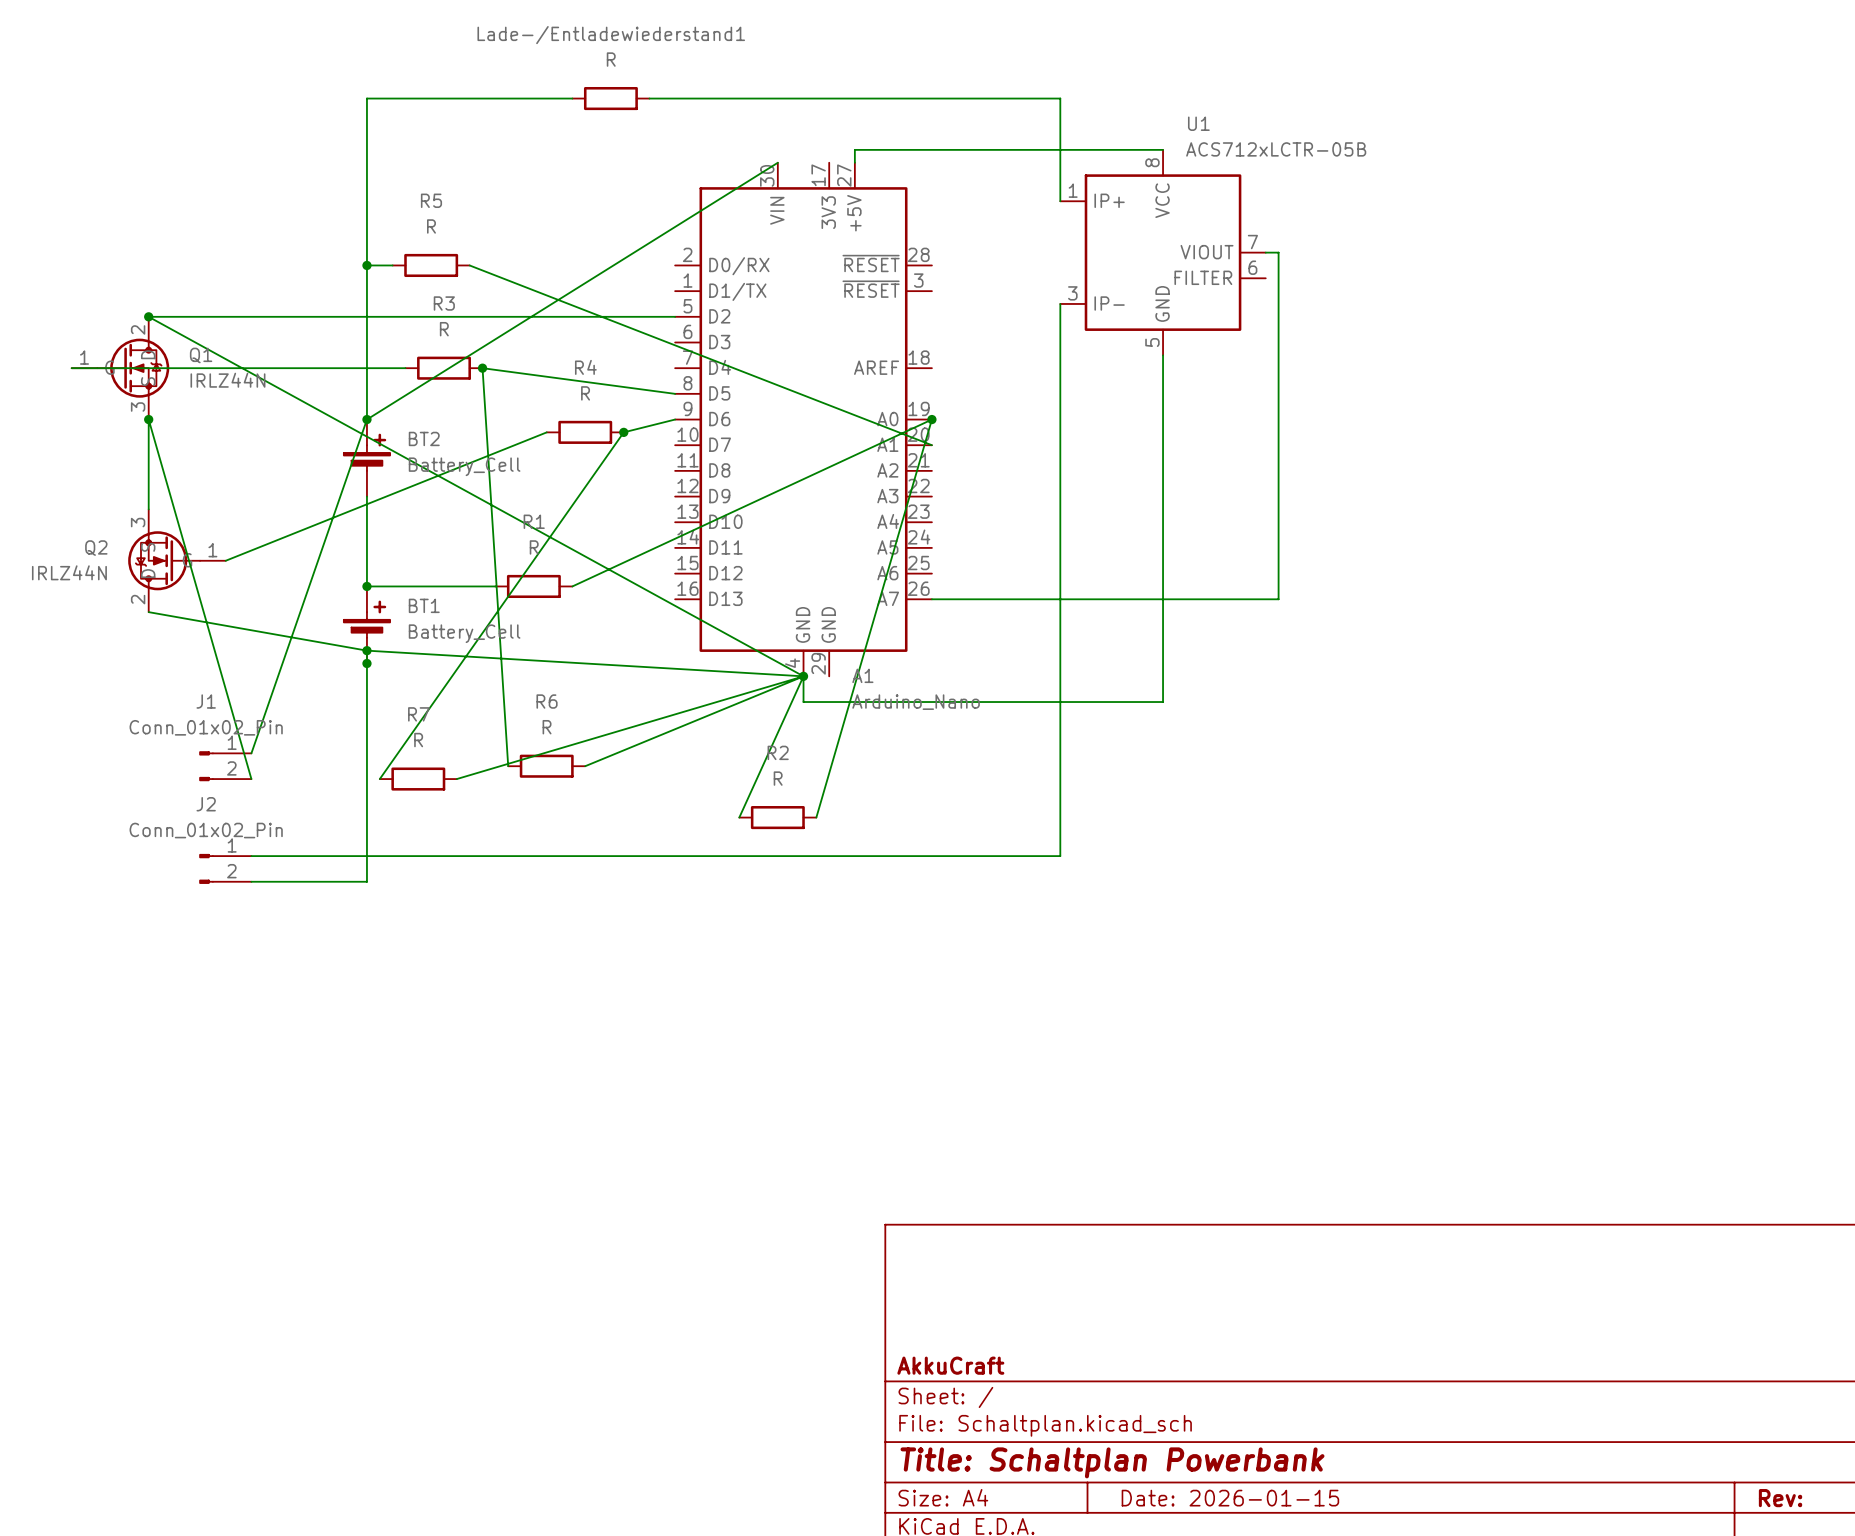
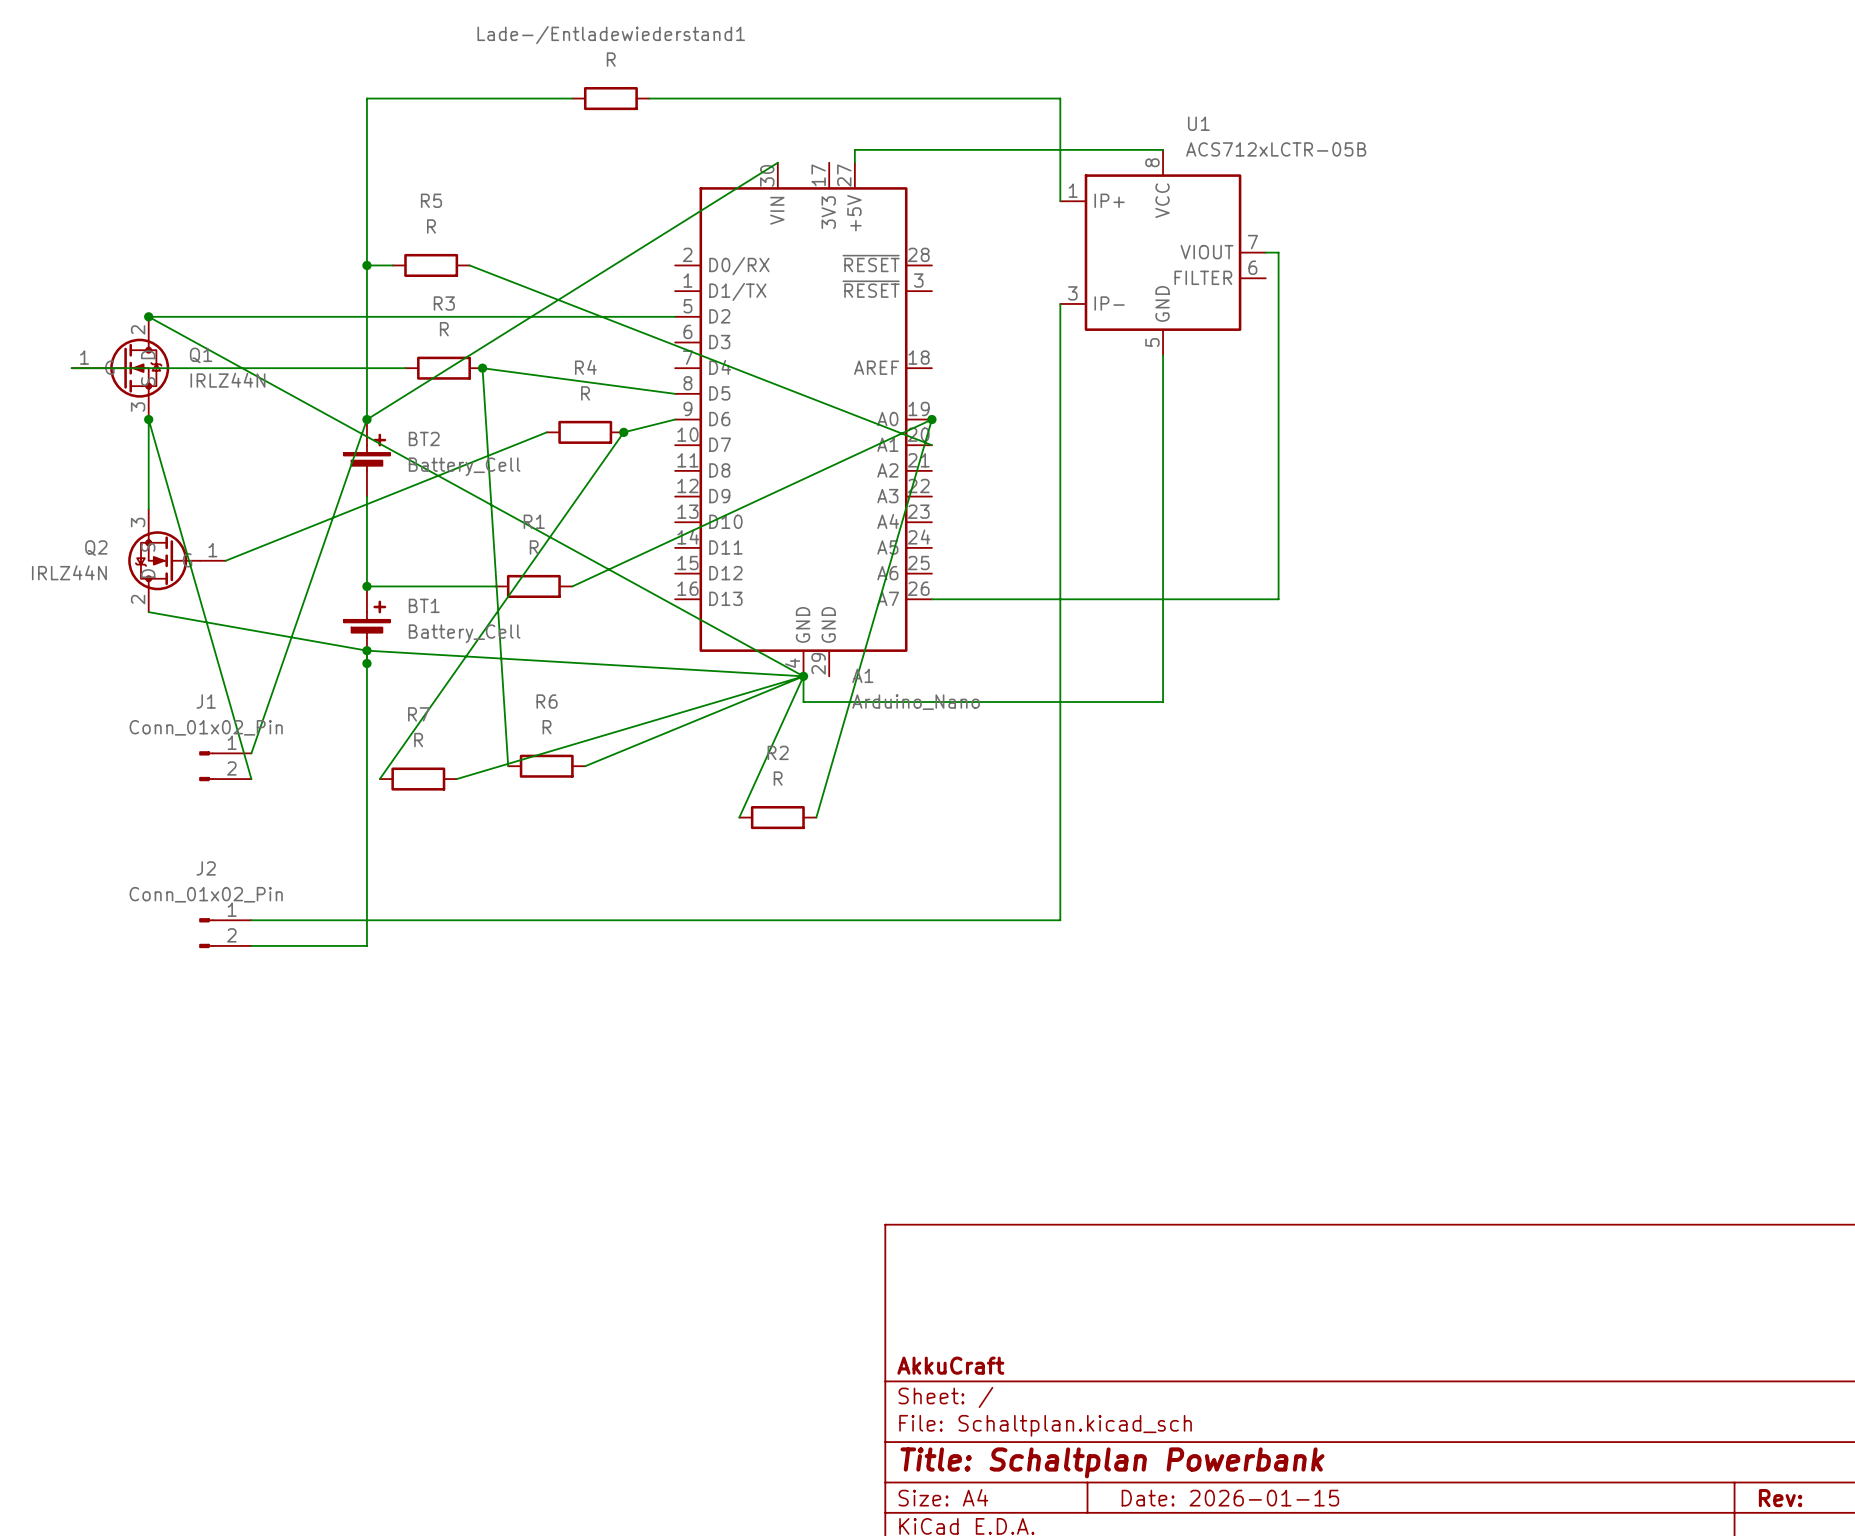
wire: (251, 856) (1060, 856) -> (251, 920) (1060, 920) (1060, 856)
J2 position: (225, 868) -> (225, 933)
wire: (251, 881) (366, 881) -> (251, 945) (366, 945) (366, 881)

